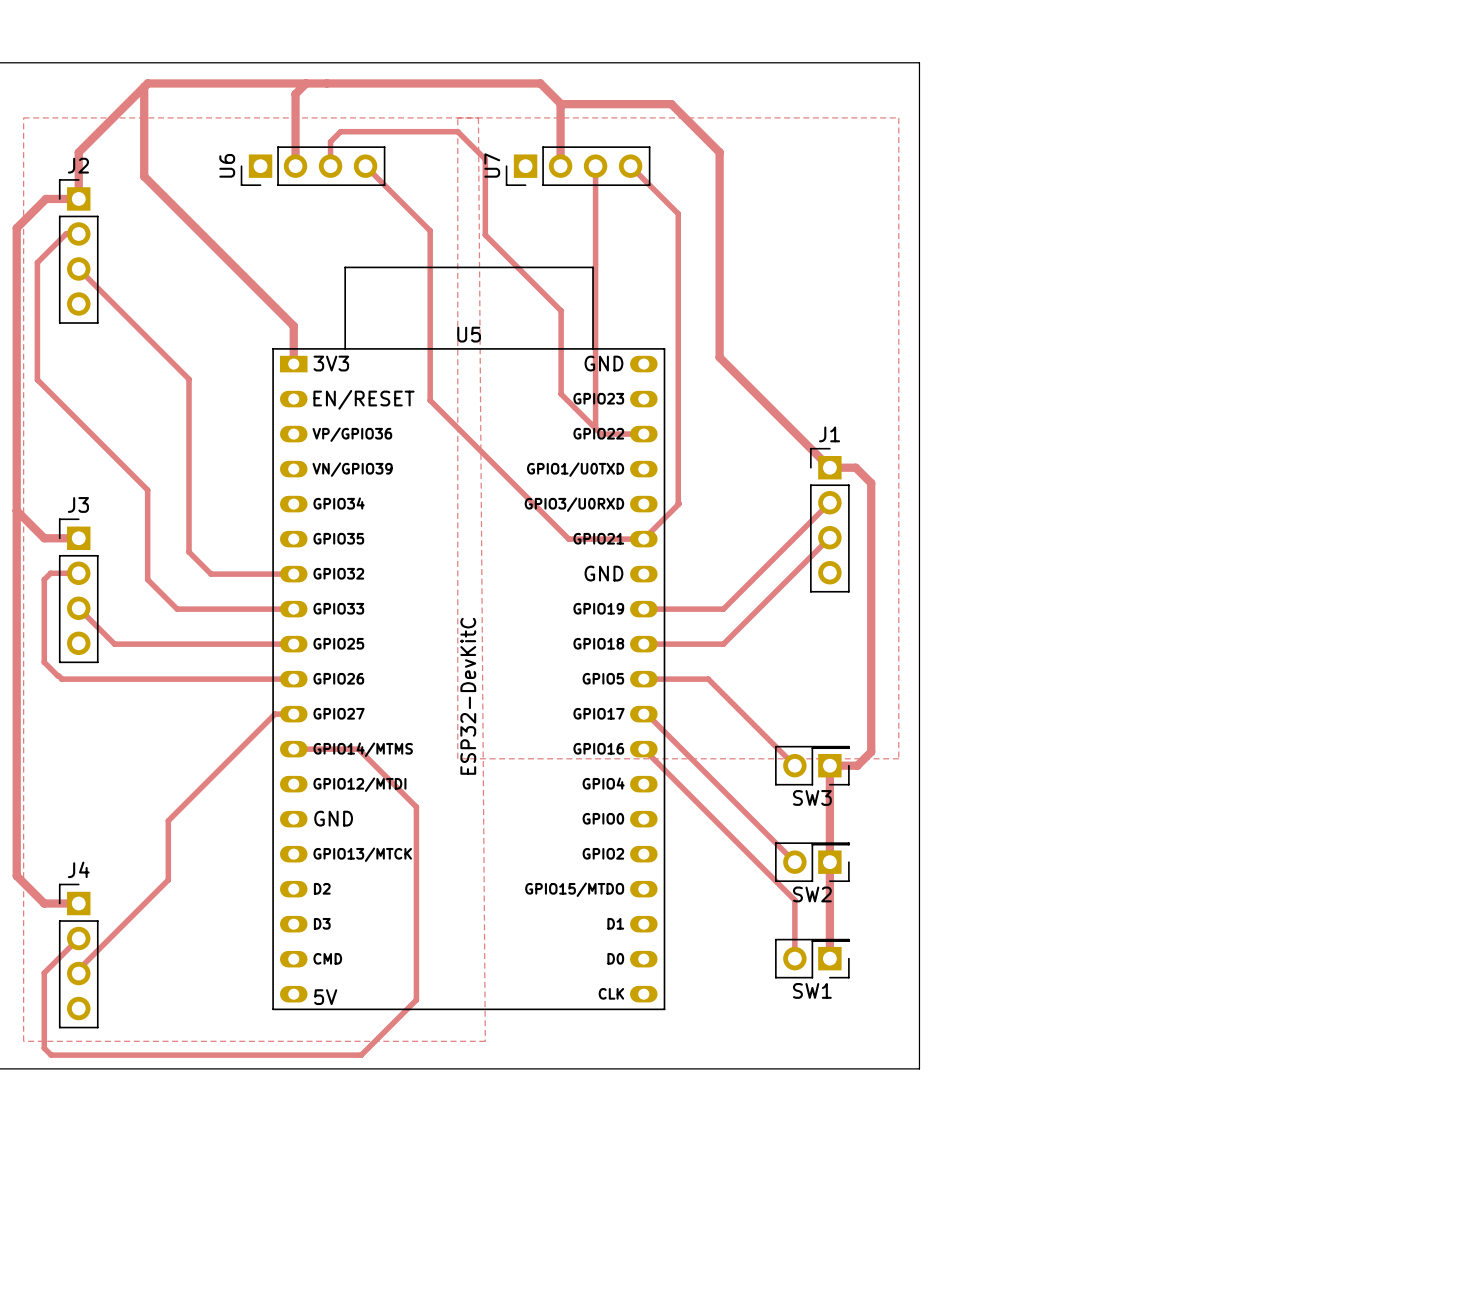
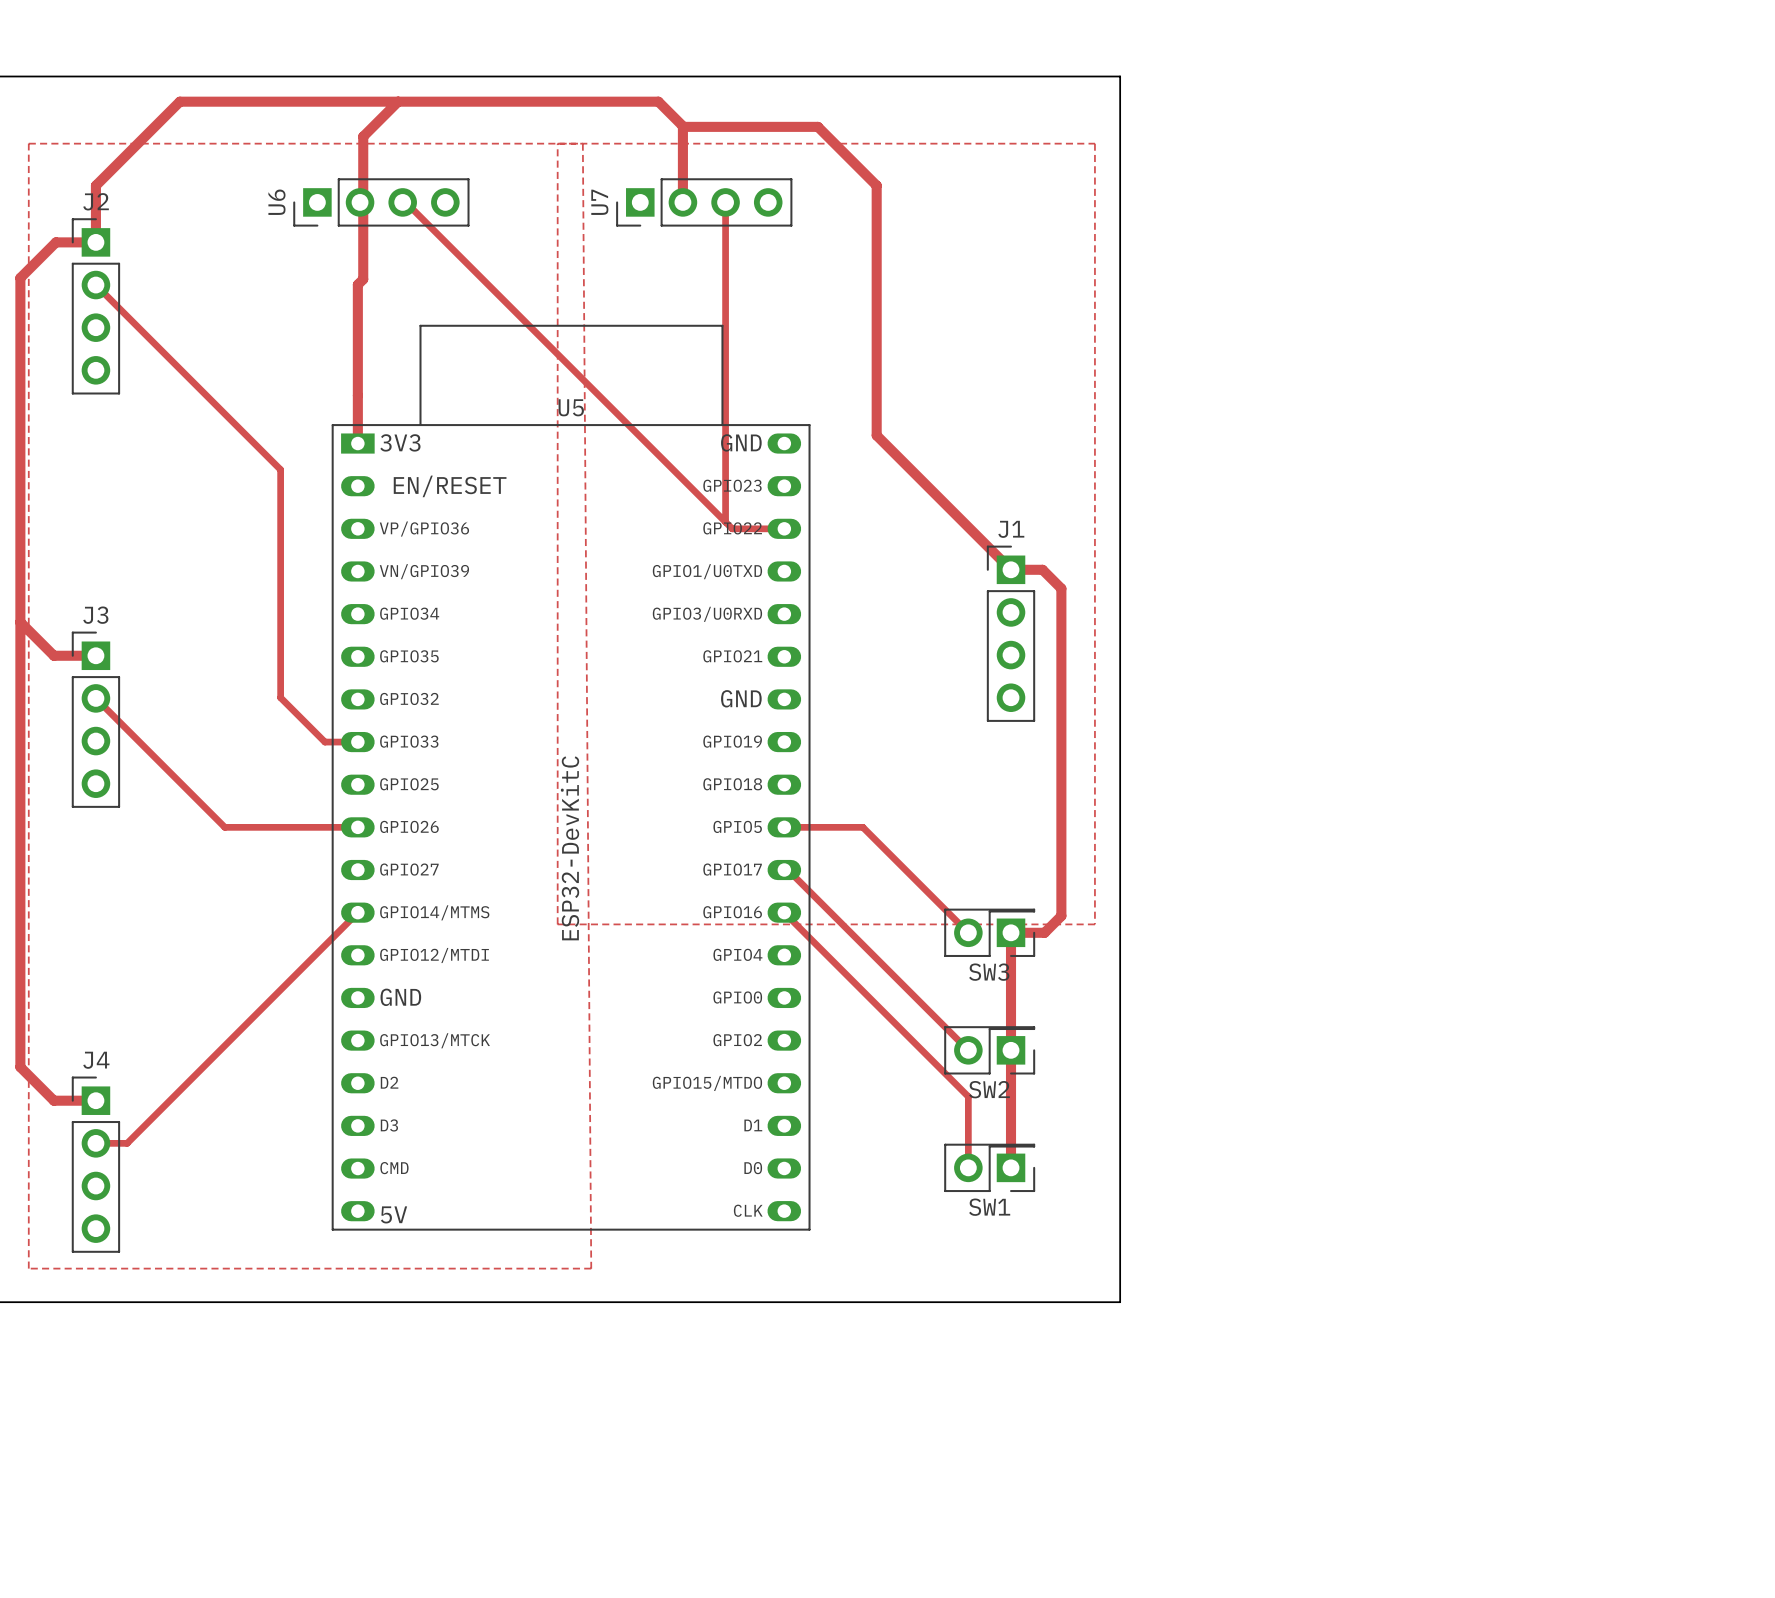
track: (306, 83) (295, 94) (295, 166) -> none
track: (144, 86) (144, 176) (293, 326) -> (398, 101) (363, 136) (363, 279) (357, 284) (357, 397)
track: (330, 166) (330, 141) (340, 131) (457, 131) (485, 159) (485, 235) (561, 310) (561, 394) -> (405, 202) (683, 480)
track: (365, 166) (430, 230) (430, 400) (568, 539) (643, 539) (679, 503) (678, 213) (630, 166) -> none
track: (78, 233) (66, 233) (37, 262) (37, 379) (147, 490) (147, 579) (177, 609) (266, 609) -> (95, 285) (280, 469) (280, 697) (324, 742)
track: (78, 268) (189, 379) (189, 552) (211, 574) (293, 574) -> none
track: (829, 502) (723, 609) (643, 609) -> none
track: (829, 537) (723, 644) (643, 644) -> none
track: (78, 573) (50, 573) (44, 579) (44, 662) (61, 679) (184, 679) -> (95, 698) (224, 827)
track: (78, 608) (114, 644) (293, 644) -> none
track: (293, 714) (275, 714) (168, 820) (168, 879) (78, 969) (78, 973) -> none
track: (293, 749) (358, 749) (416, 807) (416, 999) (361, 1055) (51, 1055) (44, 1048) (44, 972) (78, 938) -> (357, 912) (127, 1143) (95, 1143)

